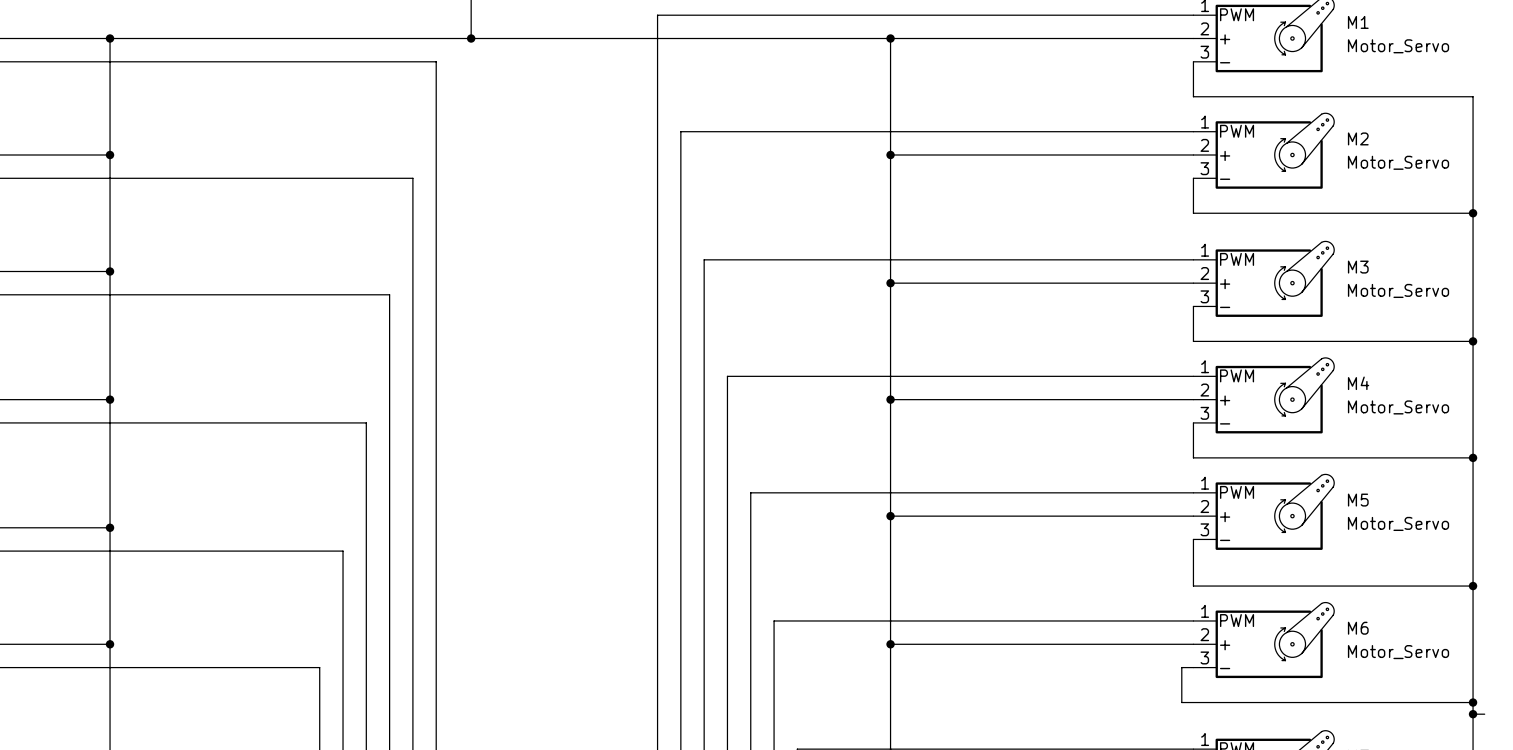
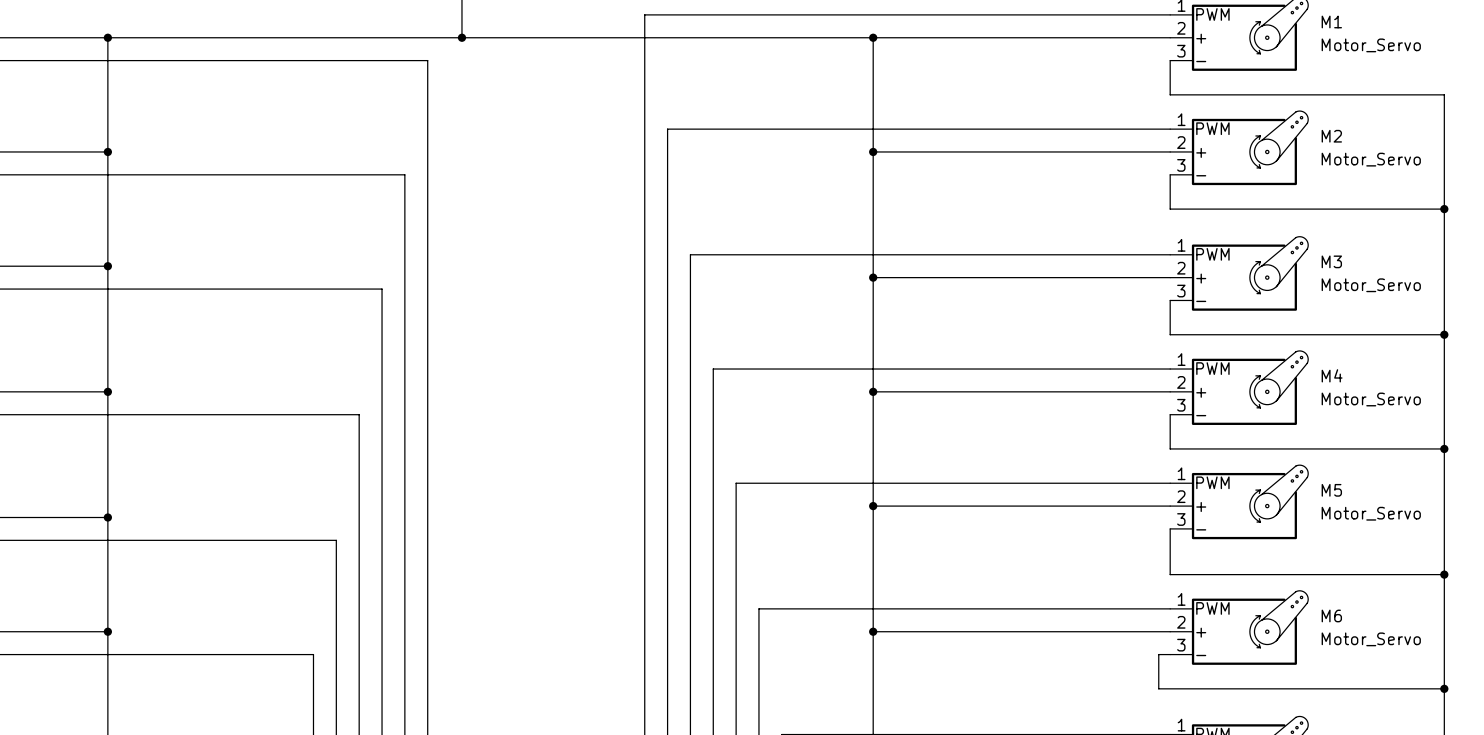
wire: (1473, 714) (1484, 714) -> none
junction: (1473, 714) -> none

